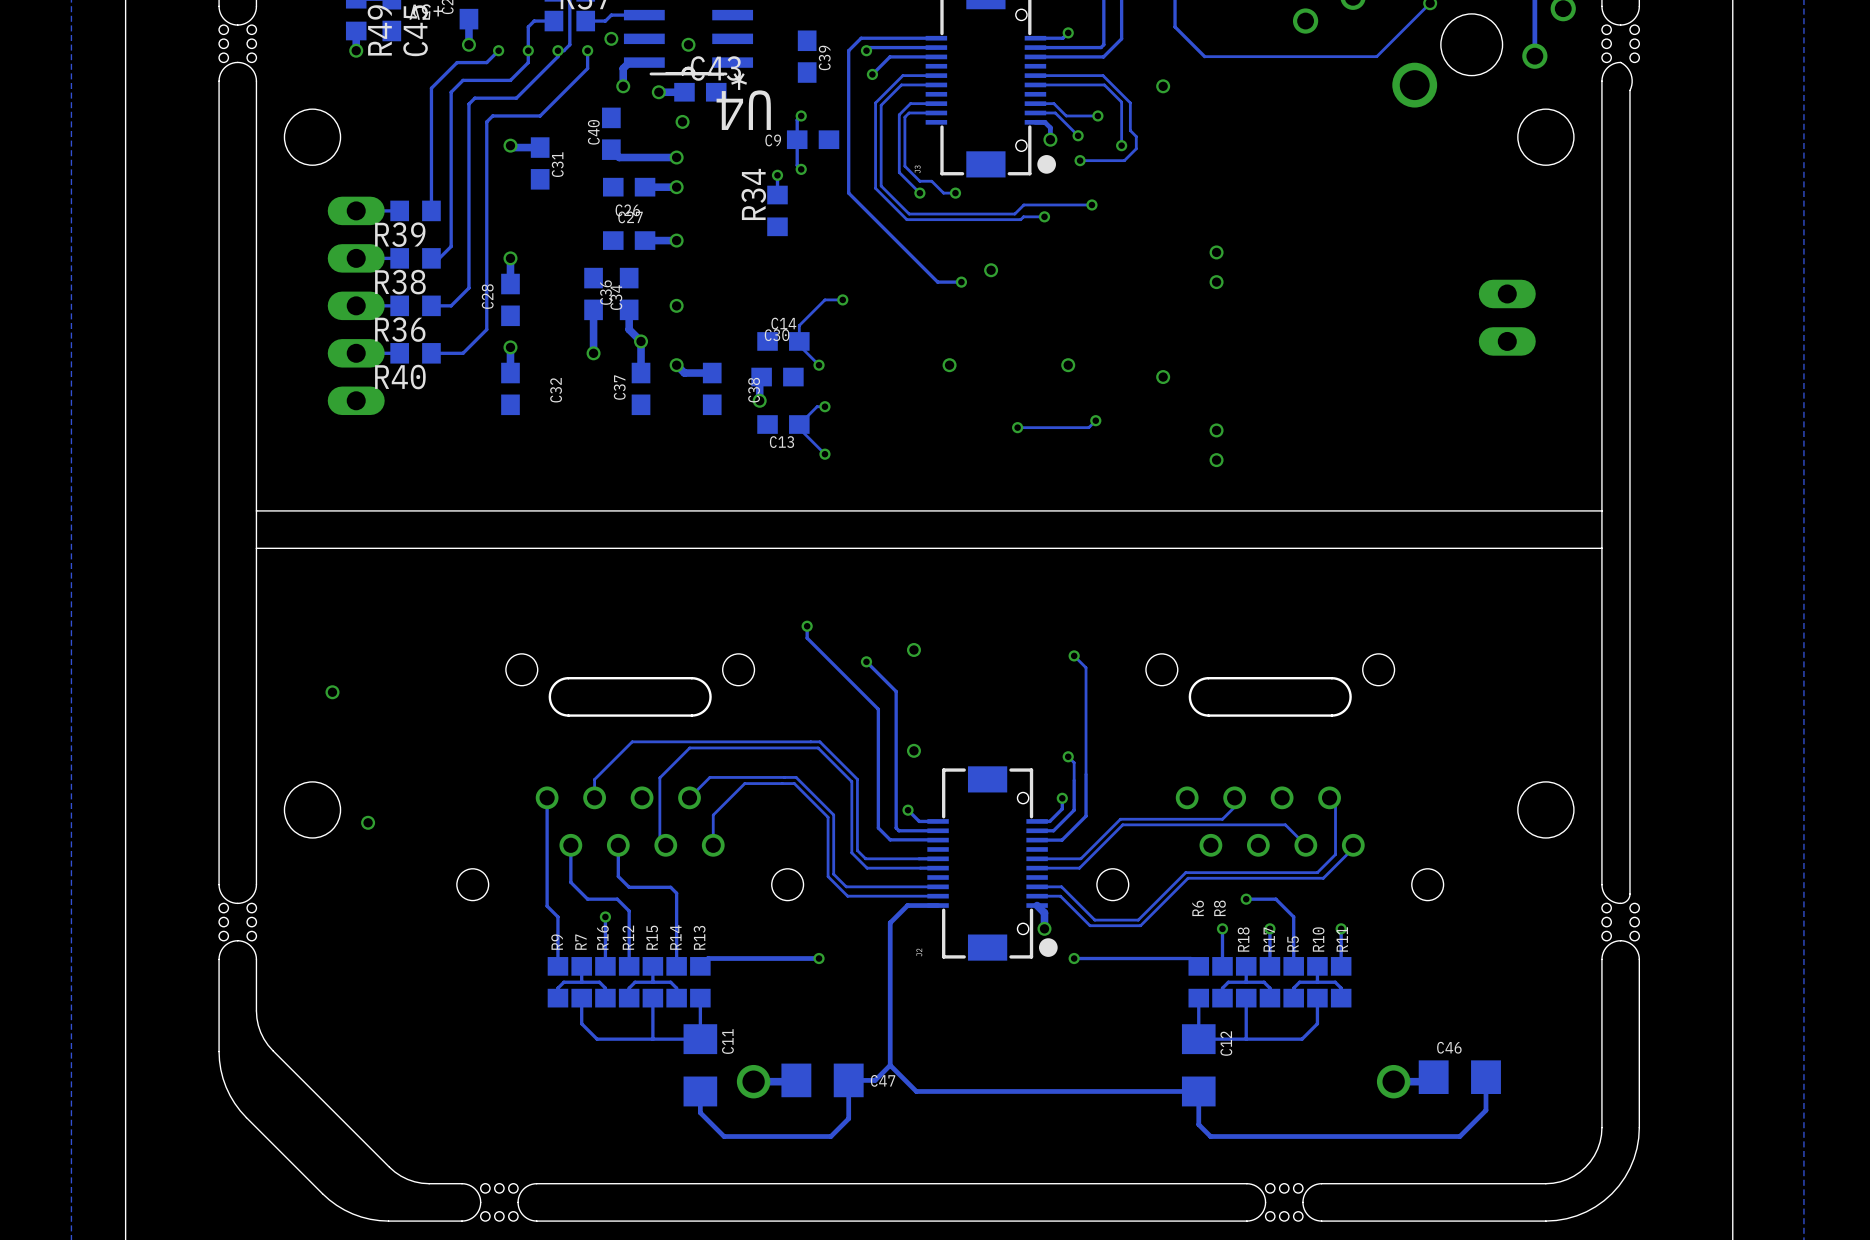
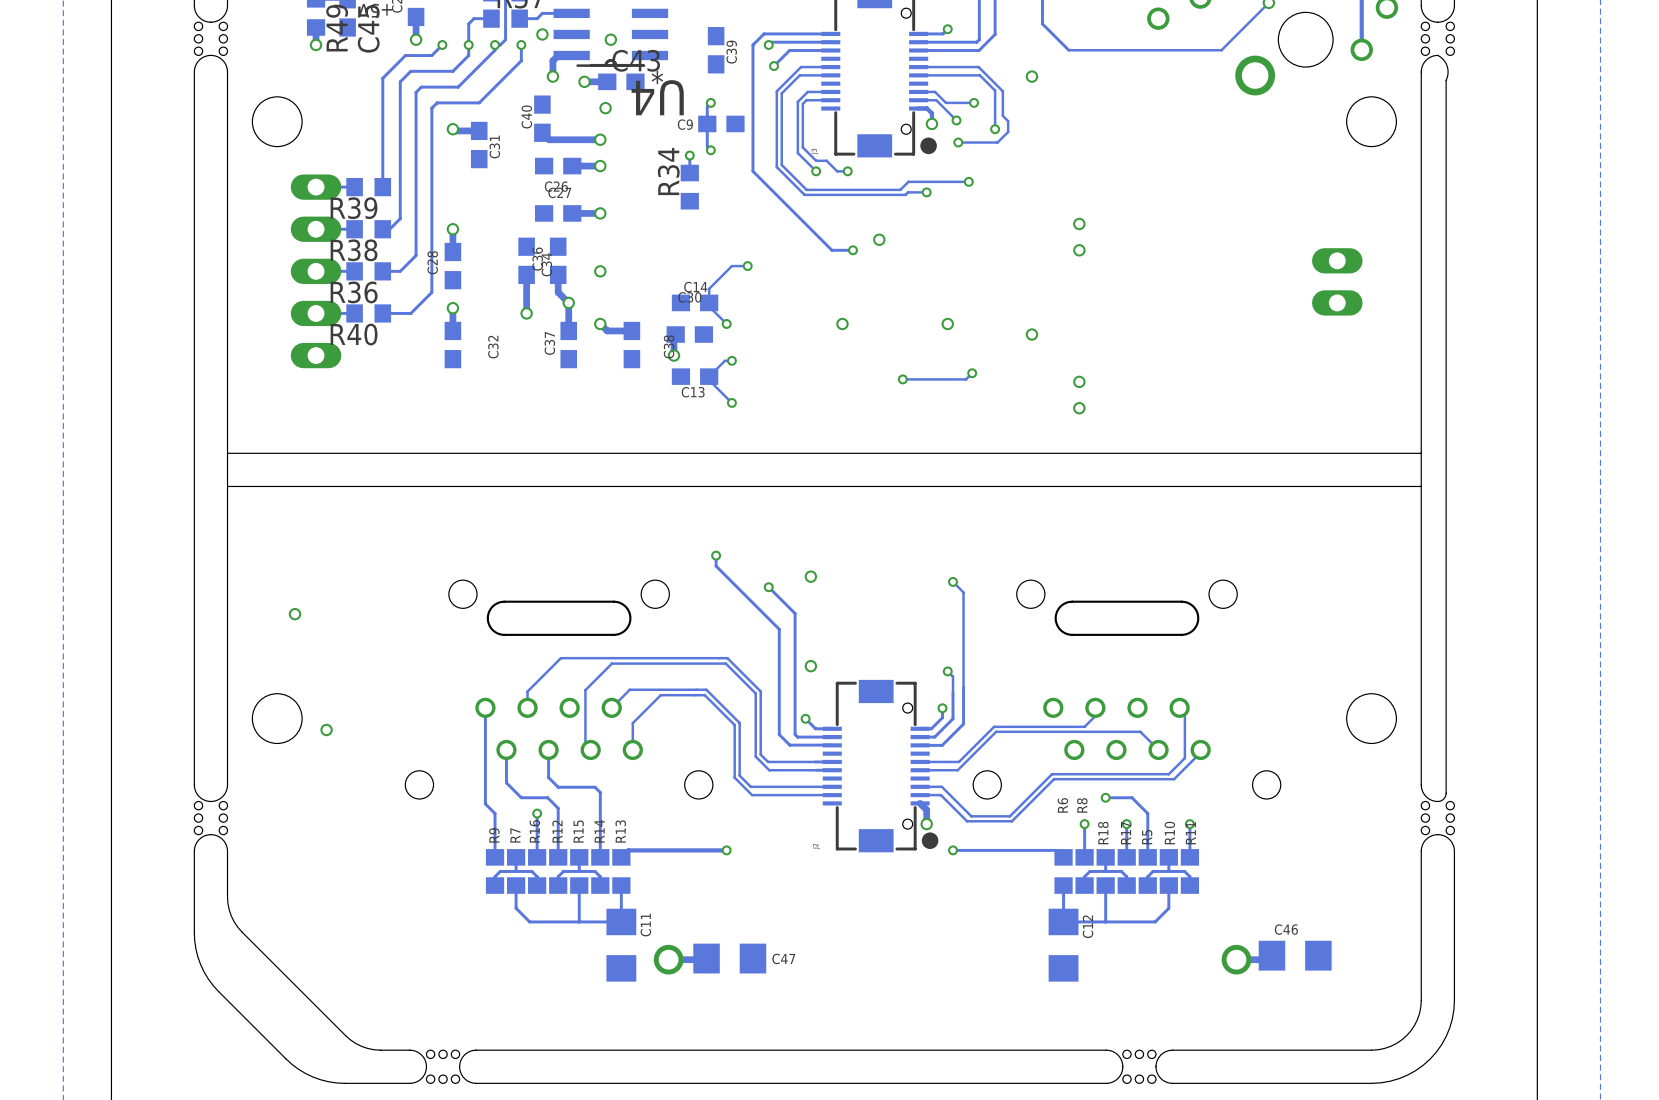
track: (938, 905) (907, 905) (890, 922) (890, 1065) -> none
track: (890, 1065) (875, 1080) (848, 1080) (848, 1118) (830, 1136) (724, 1136) (700, 1112) (700, 1091) -> none
track: (890, 1065) (916, 1091) (1198, 1091) (1198, 1124) (1210, 1136) (1459, 1136) (1485, 1110) (1485, 1077) -> none

